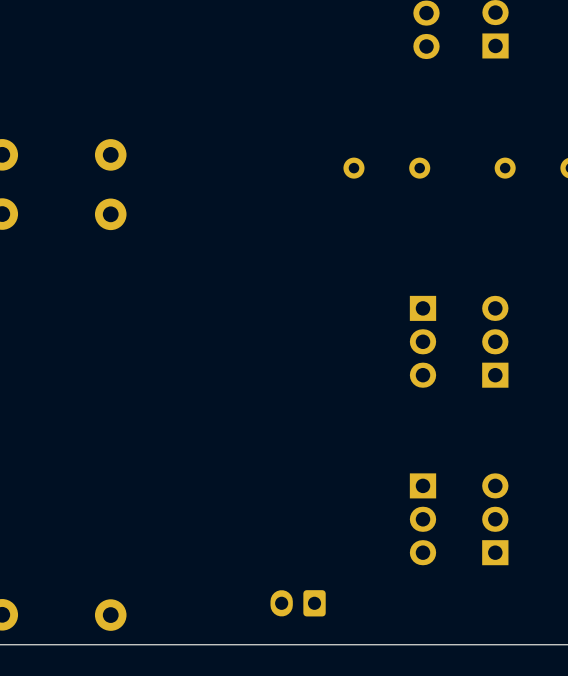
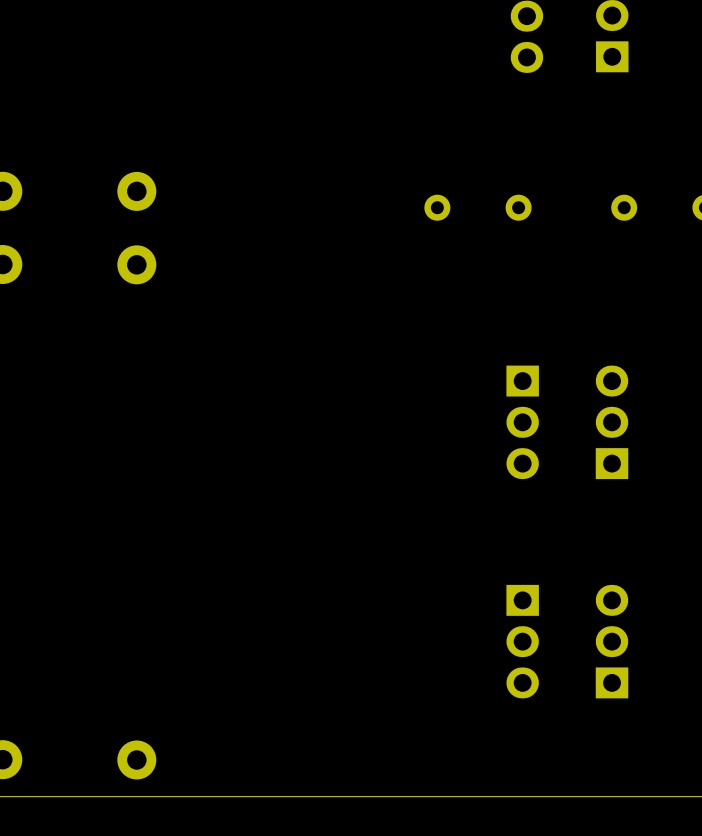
part: (298, 603) -> none

